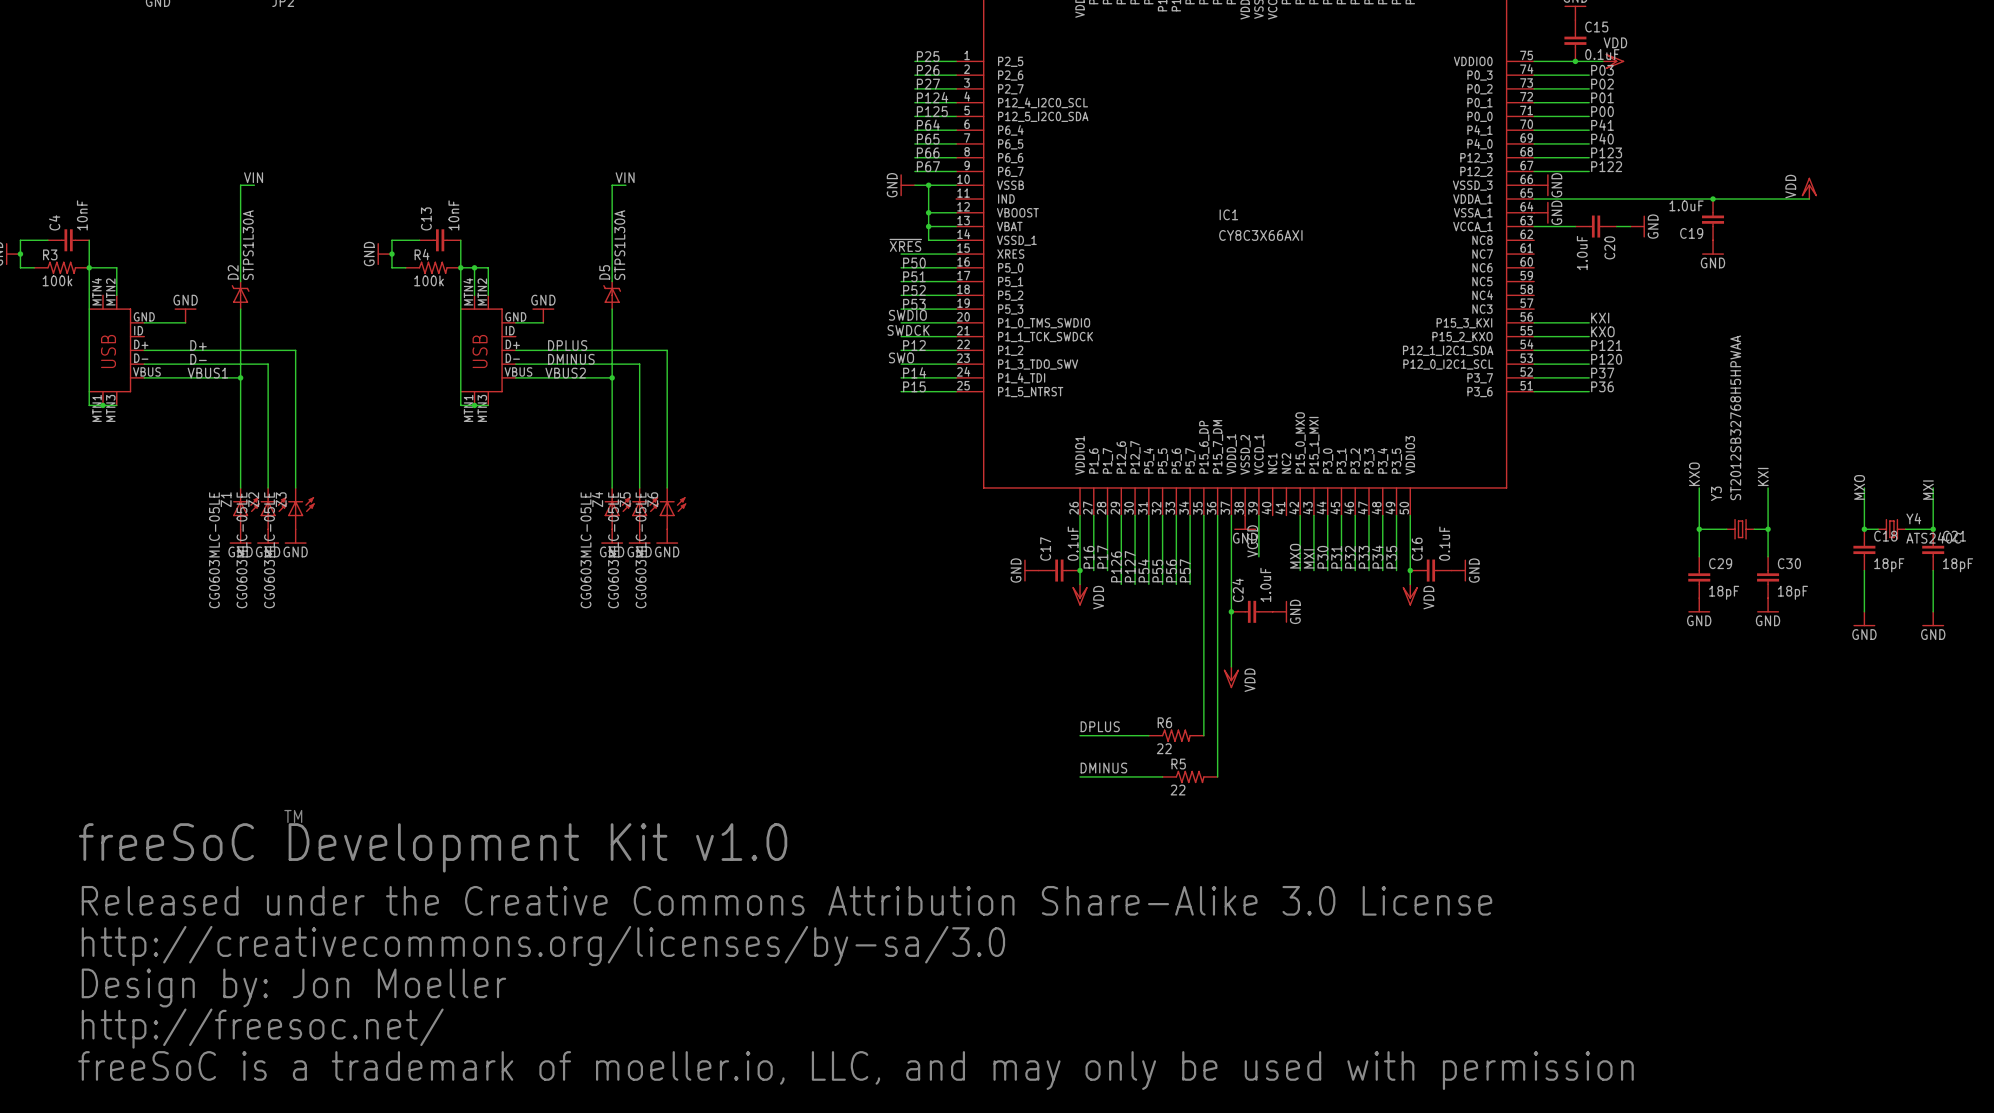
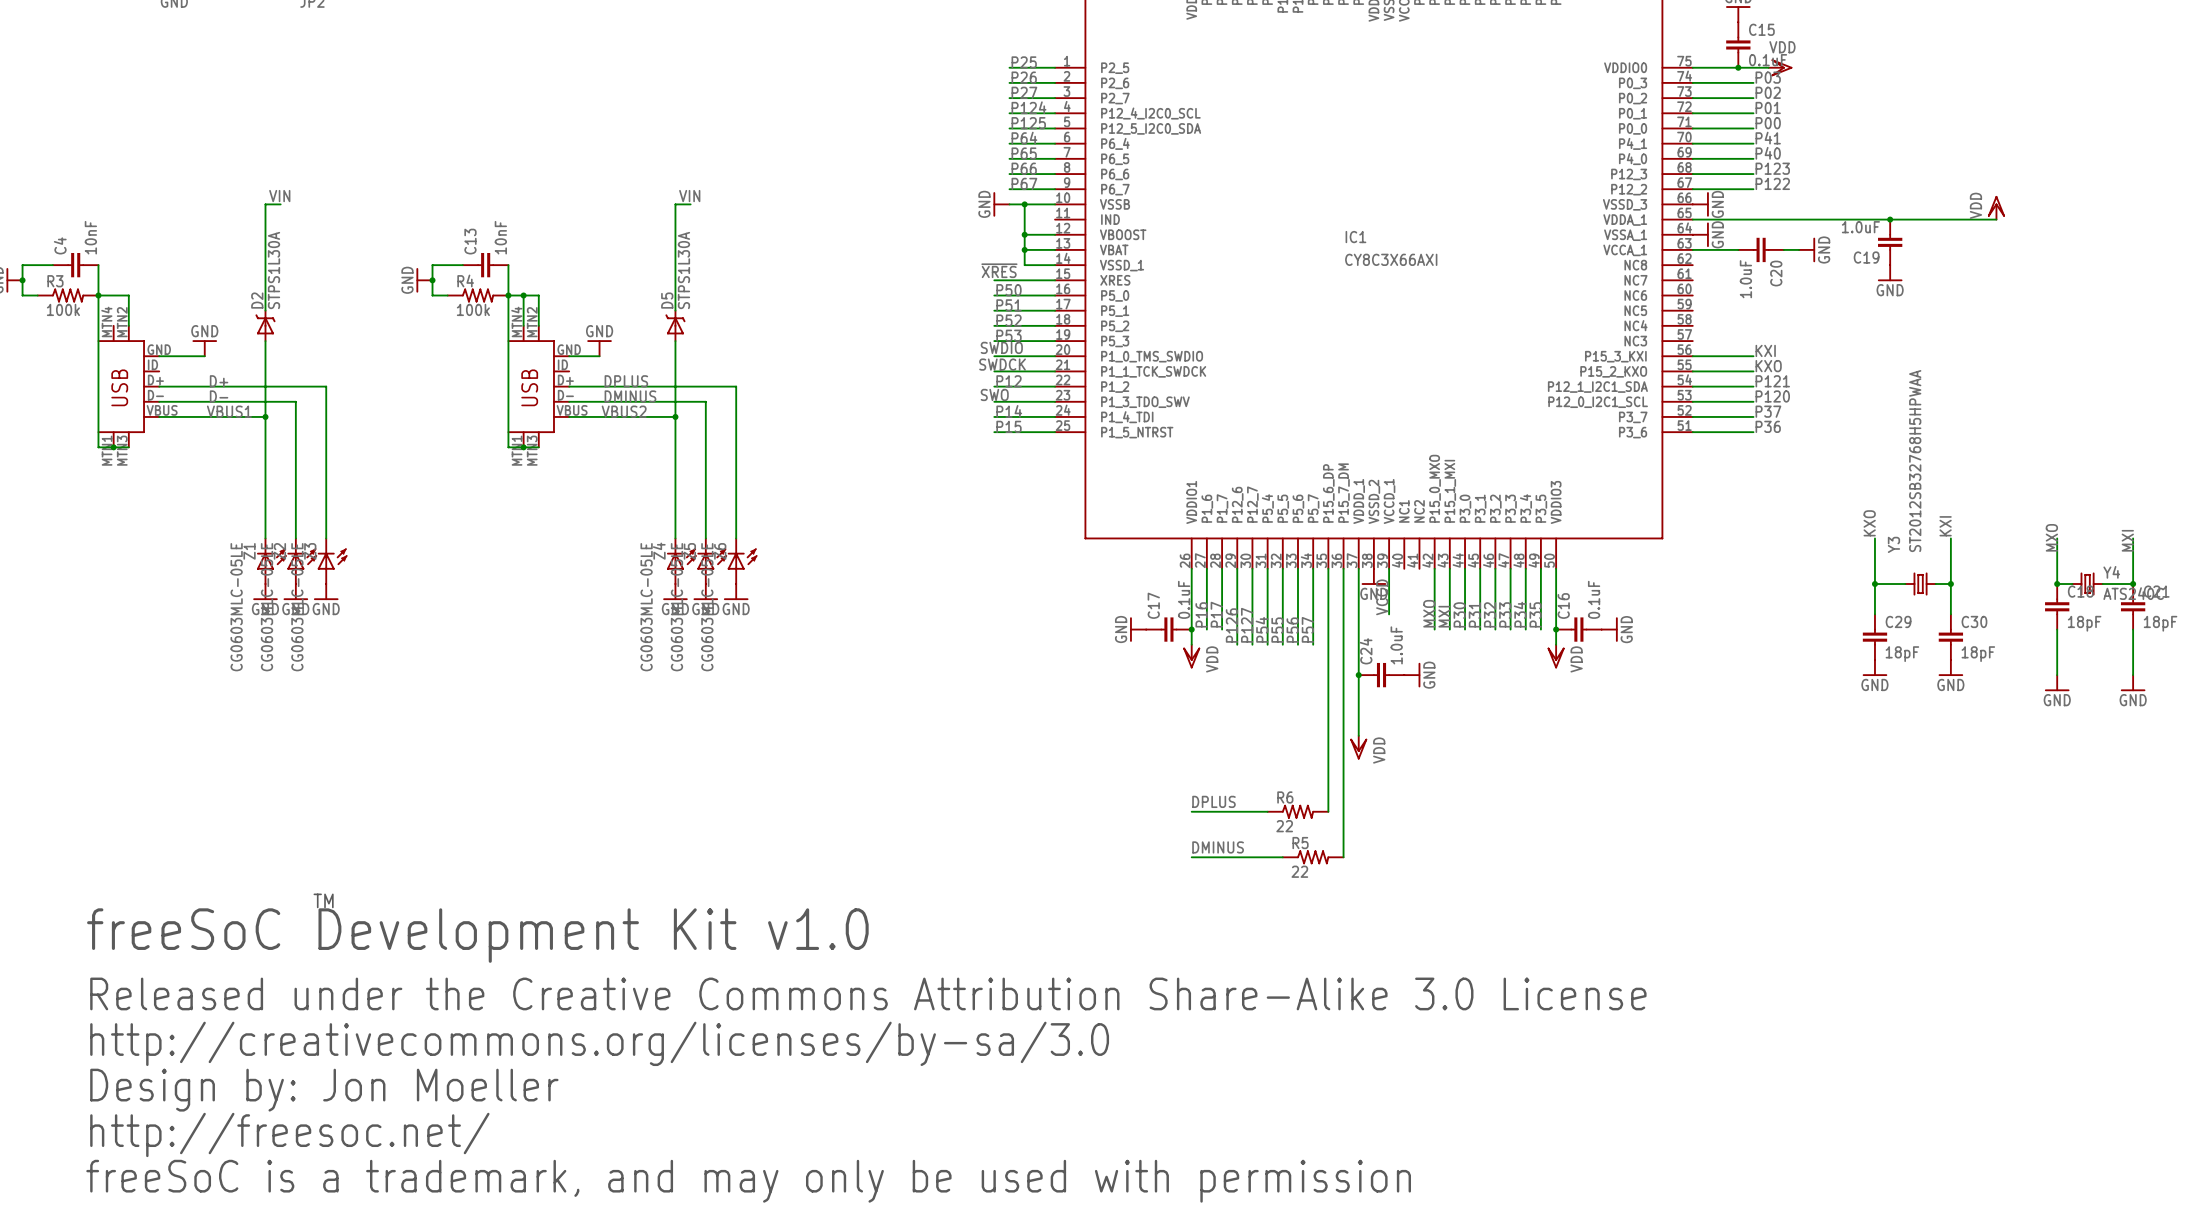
text: freeSoC is a trademark of moeller.io, LLC, and may only be used with permission (855, 1070) -> freeSoC is a trademark, and may only be used with permission (748, 1181)

